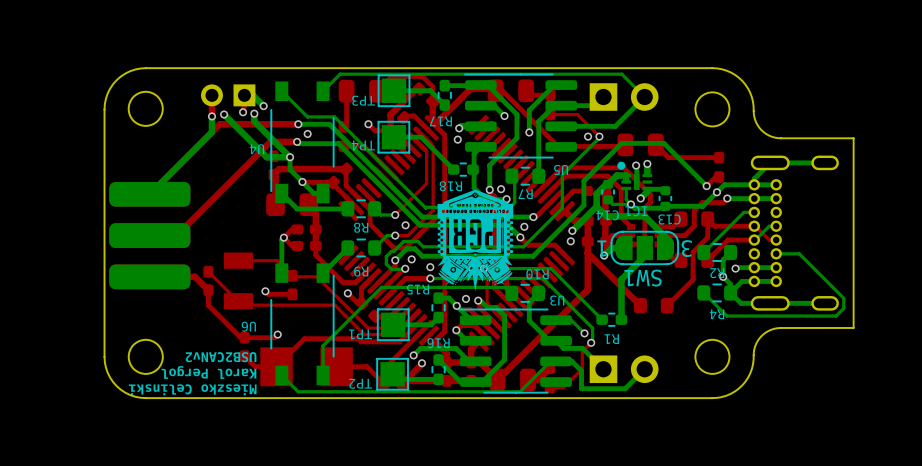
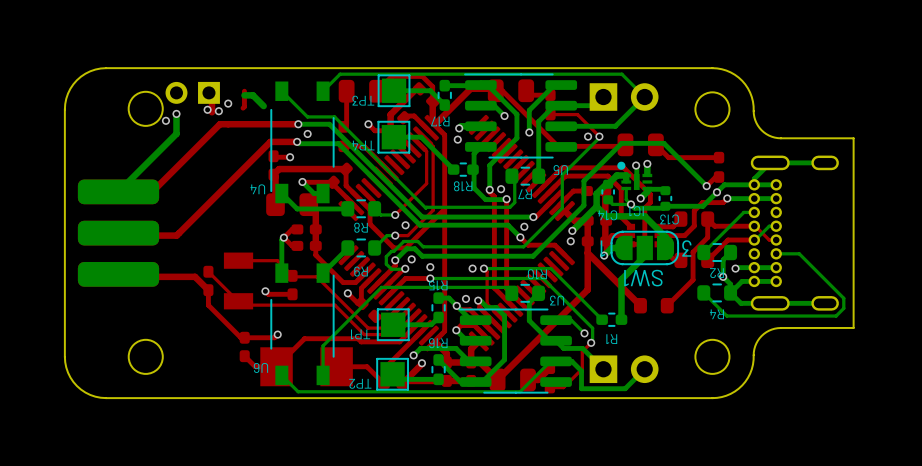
board edge: (712, 68) (140, 68) (125, 73) (113, 84) (105, 98) (104, 109) (104, 362) (113, 381) (129, 394) (145, 398) (712, 398) -> (712, 68) (106, 68) (90, 71) (76, 80) (68, 93) (64, 109) (65, 362) (73, 381) (90, 394) (106, 398) (712, 398)
part position: (228, 95) -> (192, 92)
via: none -> (228, 103)
via: (263, 106) -> none
via: none -> (207, 109)
via: none -> (218, 111)
via: (243, 112) -> none
bottom track: none -> (176, 113) (176, 133) (118, 191)
via: none -> (176, 113)
bottom track: (254, 113) (254, 121) (290, 157) -> none
via: (254, 113) -> none
bottom track: (224, 114) (266, 157) (290, 157) -> none
via: (224, 114) -> none
bottom track: (211, 116) (211, 132) (149, 194) -> none
via: (211, 116) -> none
via: none -> (165, 120)
U4 name position: U4 (256, 149) -> U4 (257, 189)
bottom track: (290, 157) (290, 169) (302, 181) -> none
R18 name position: R18 (450, 186) -> R18 (463, 186)
drawing: [437, 189, 514, 292] -> none
part position: (149, 235) -> (118, 233)
R15 name position: R15 (418, 289) -> R15 (438, 285)
U6 name position: U6 (248, 326) -> U6 (260, 367)
text: USB2CANv2 (221, 357) -> none
text: Karol Pergol (208, 372) -> none
text: Mieszko Celinski (192, 389) -> none

